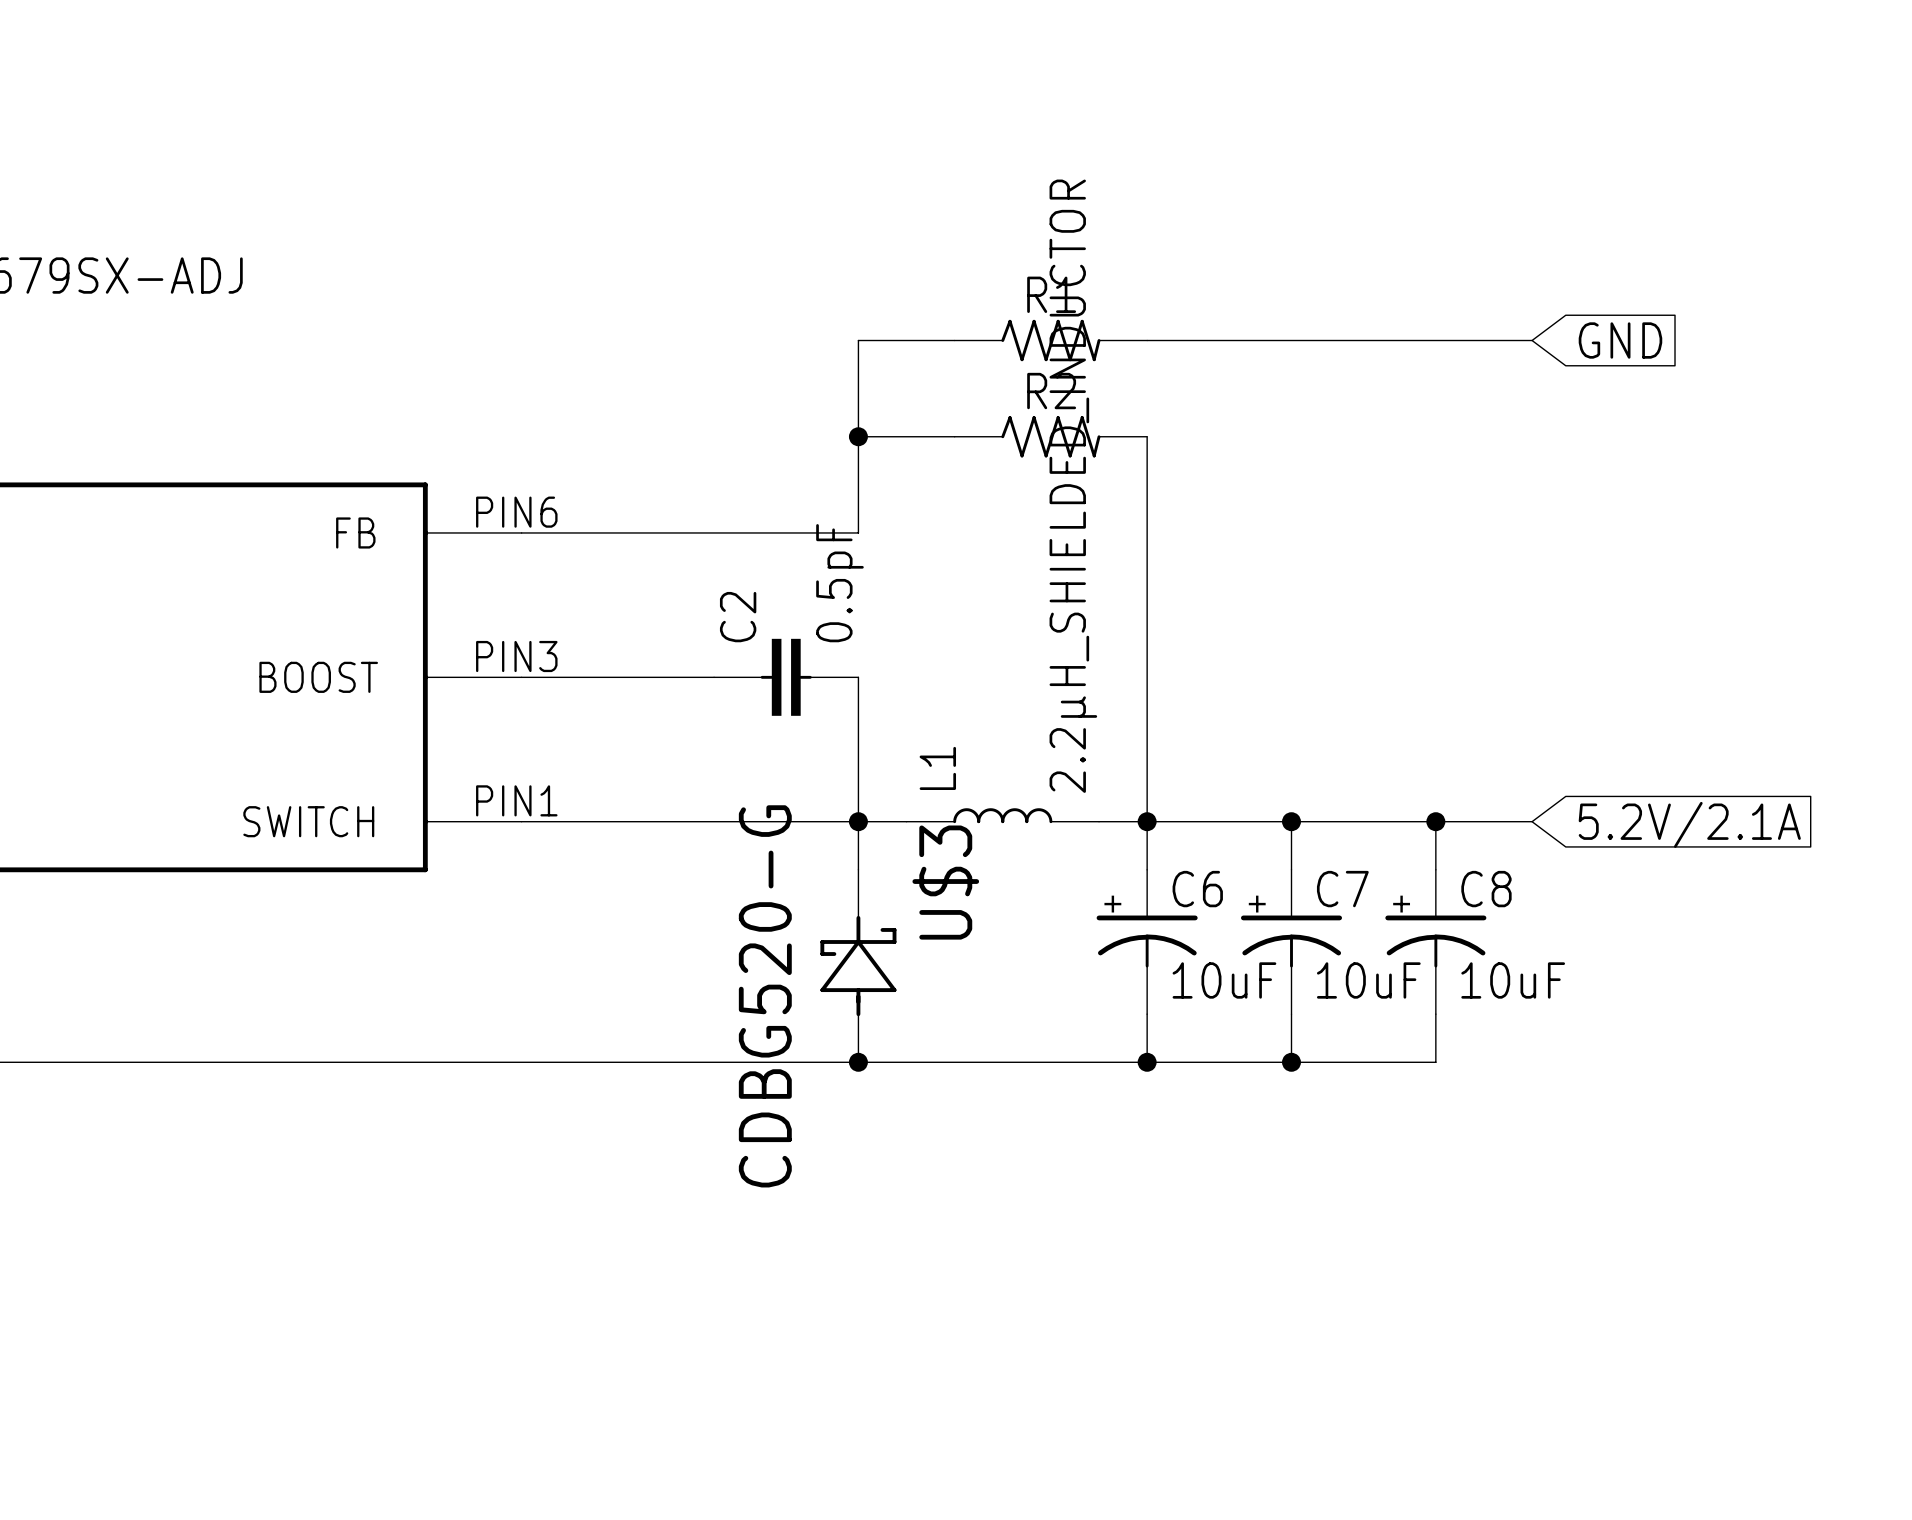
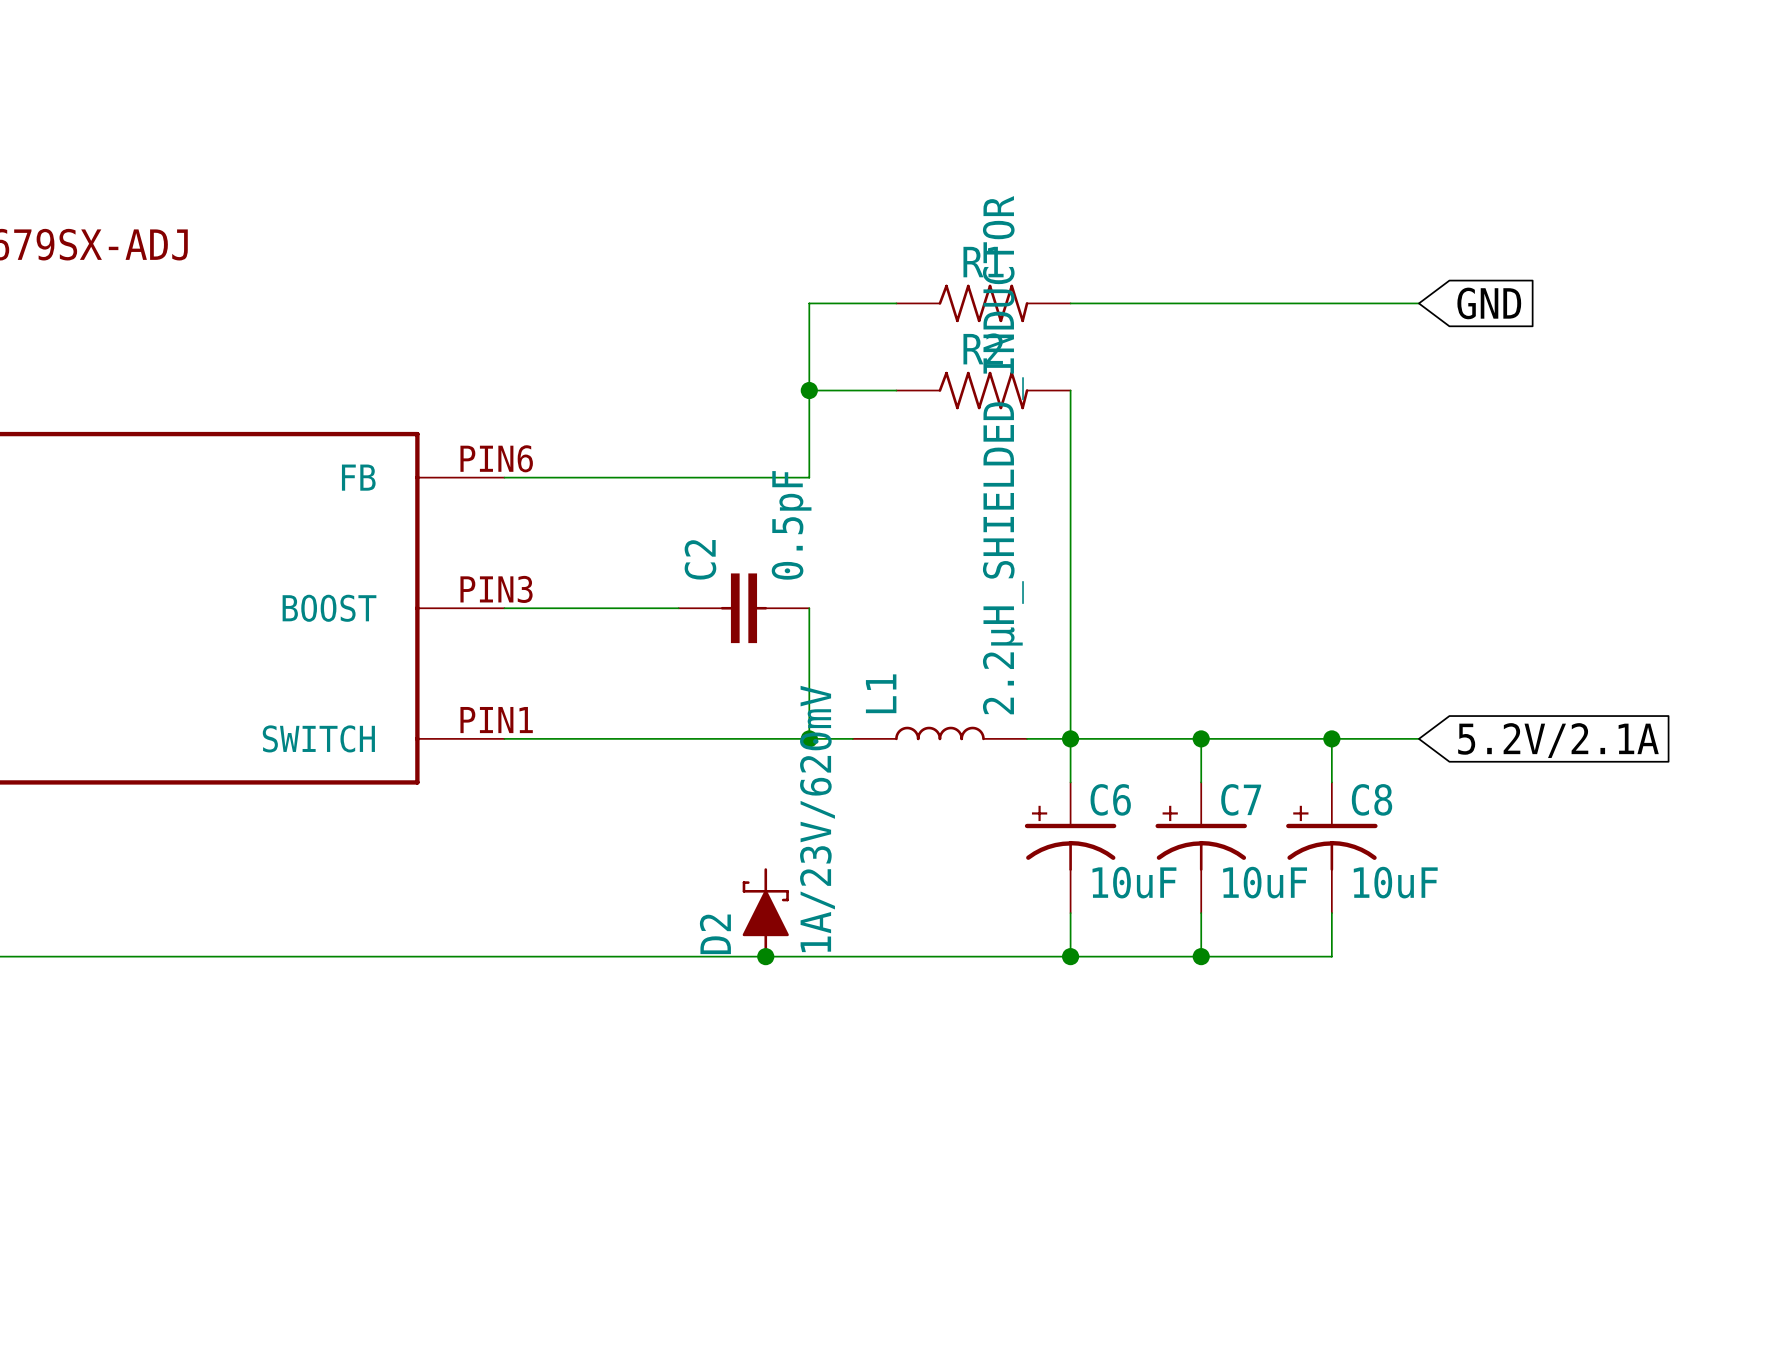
wire: (858, 821) (858, 869) -> none
U$3: CDBG520-G (858, 966) -> none
D2: none -> 1A/23V/620mV (765, 913)
junction position: (858, 1062) -> (765, 956)

